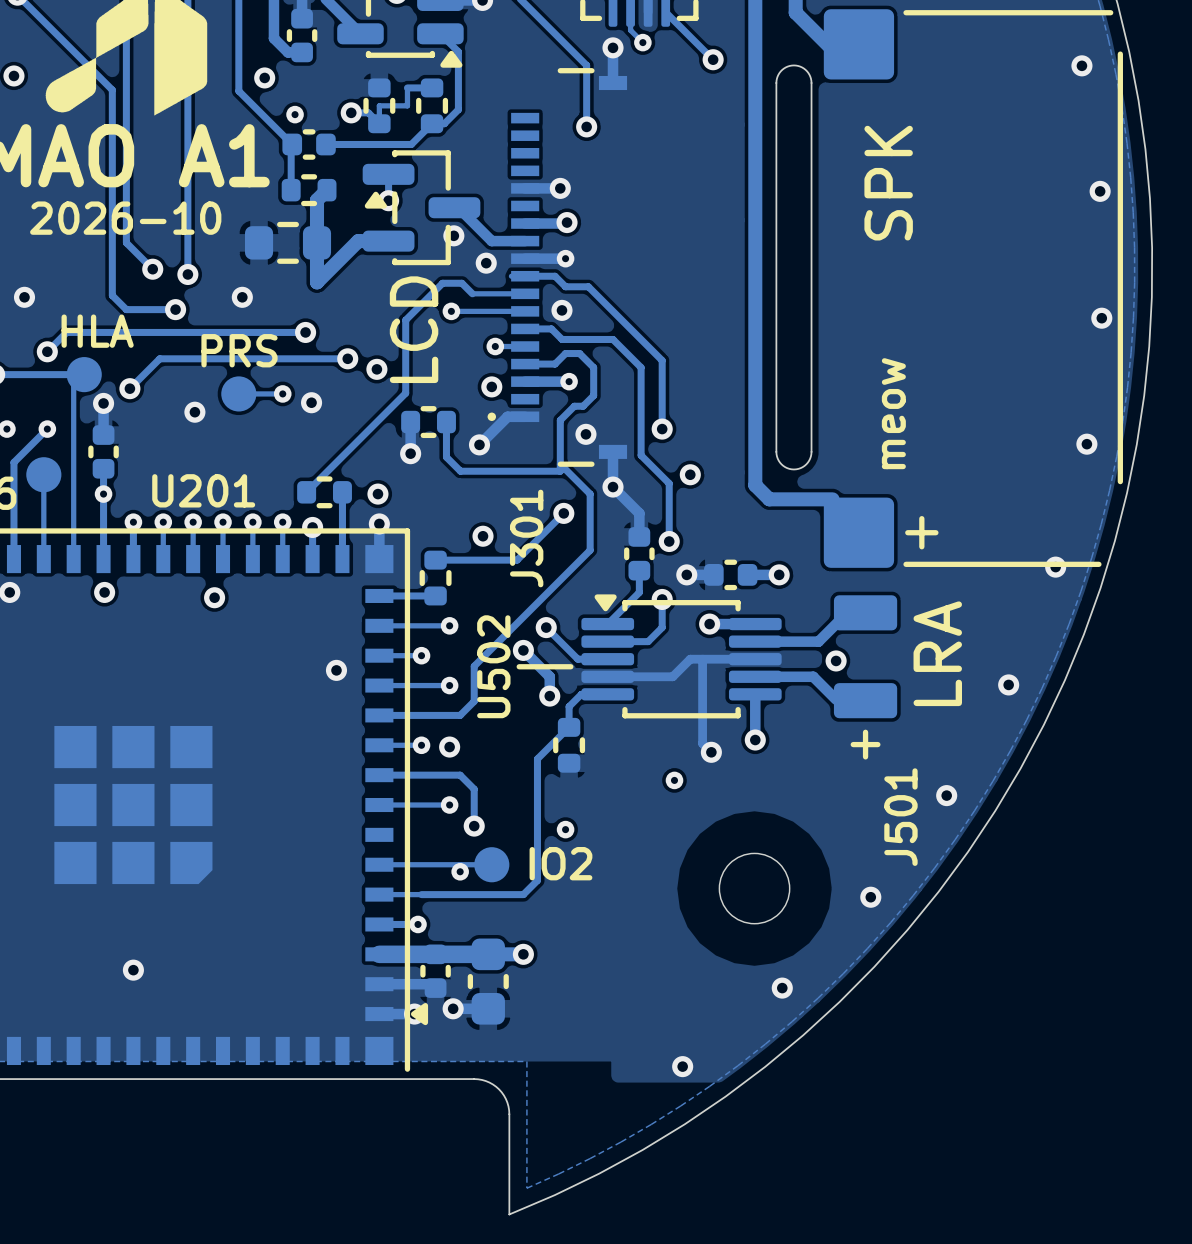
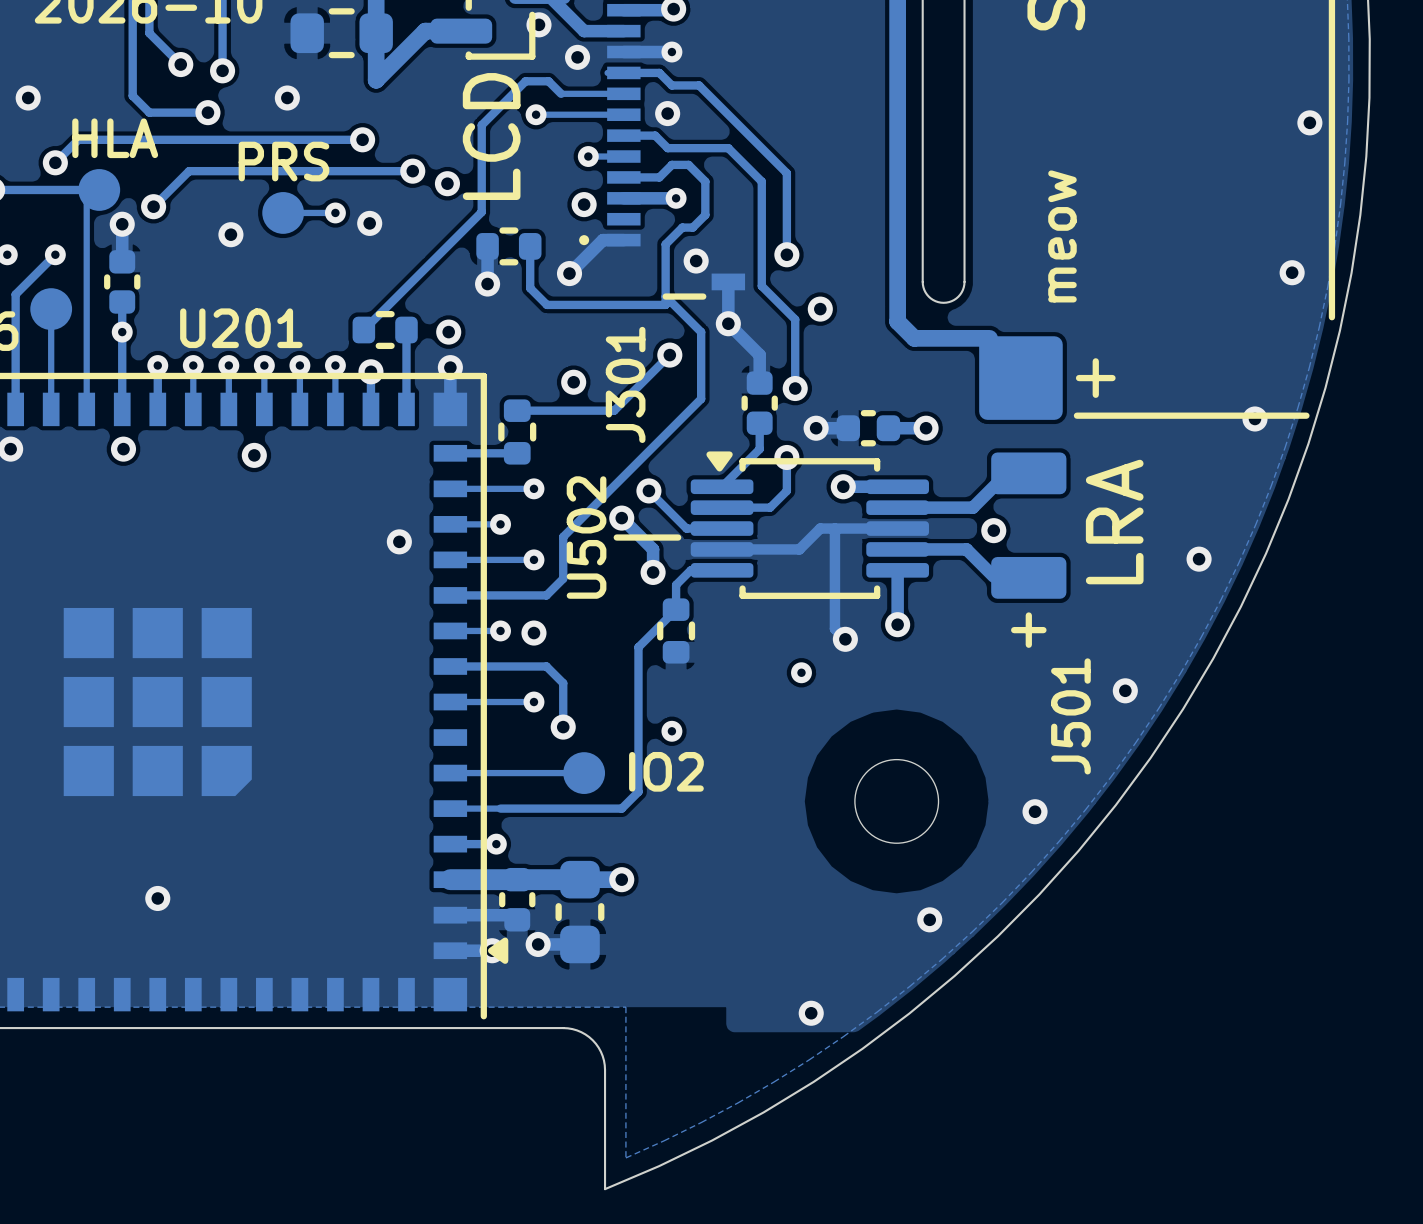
via: (460, 871) -> none

